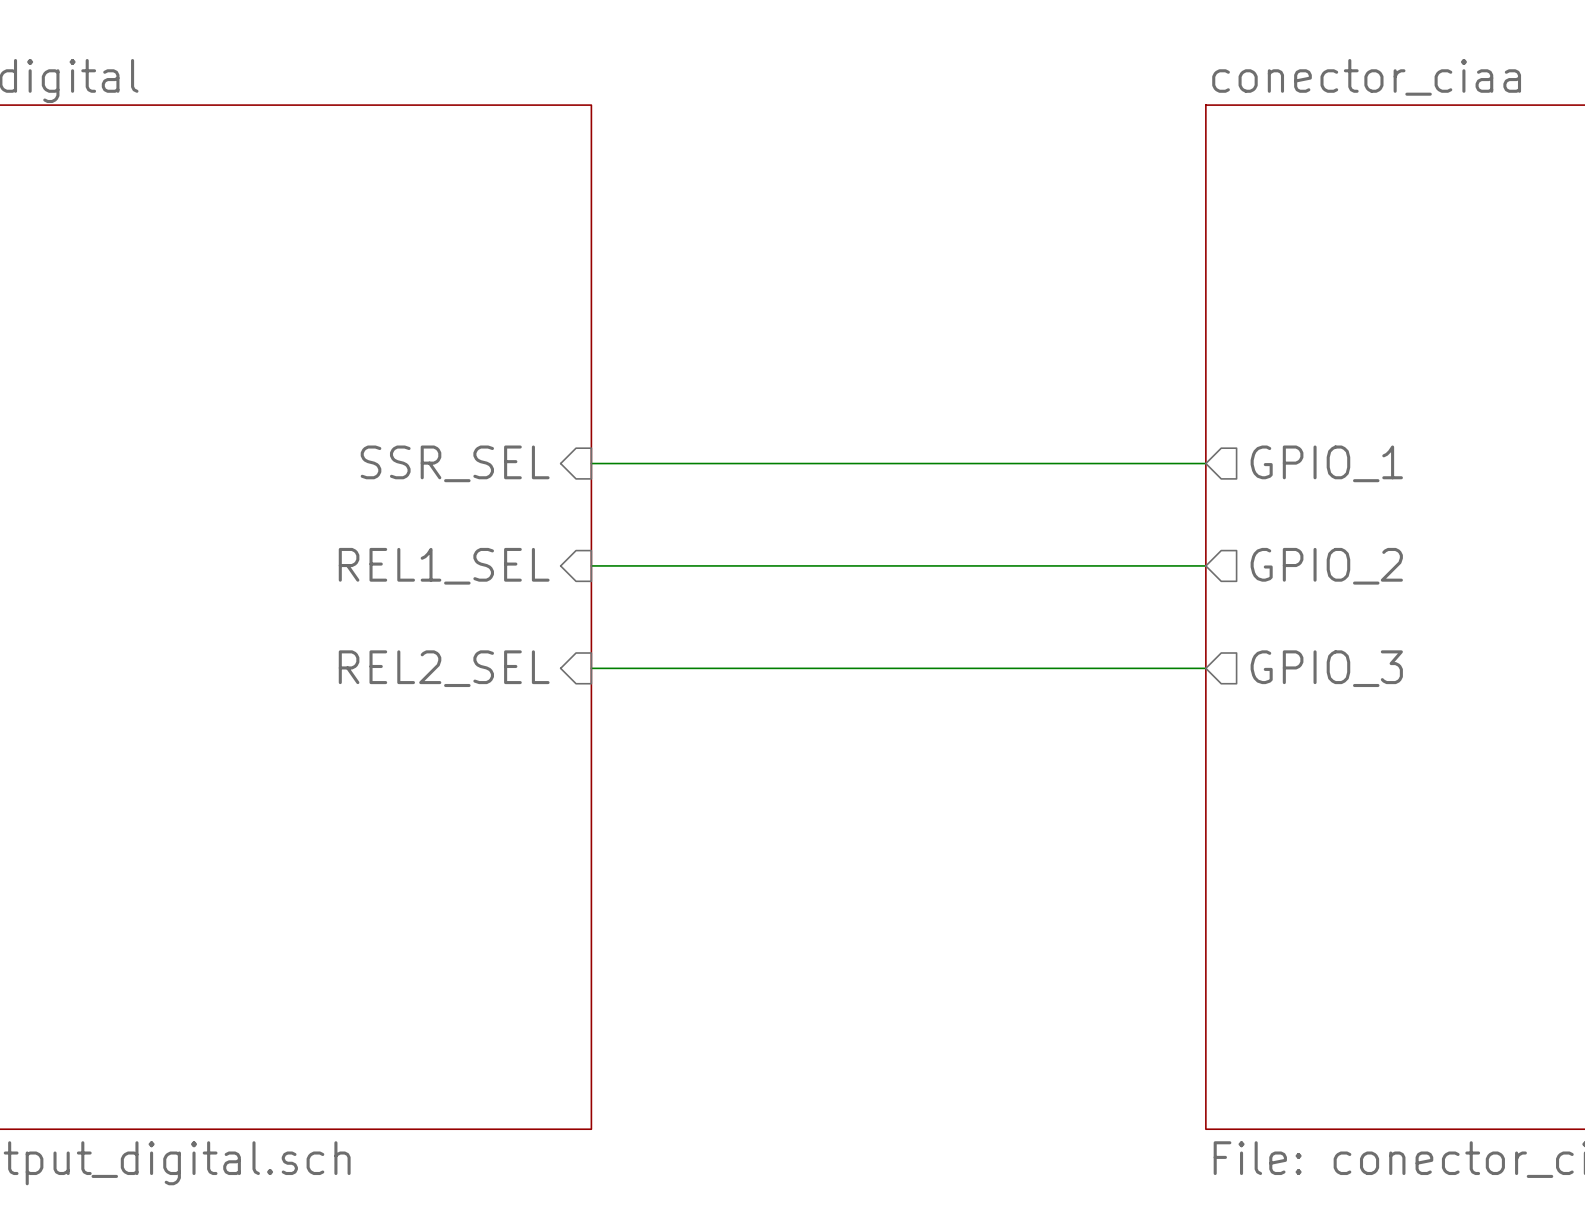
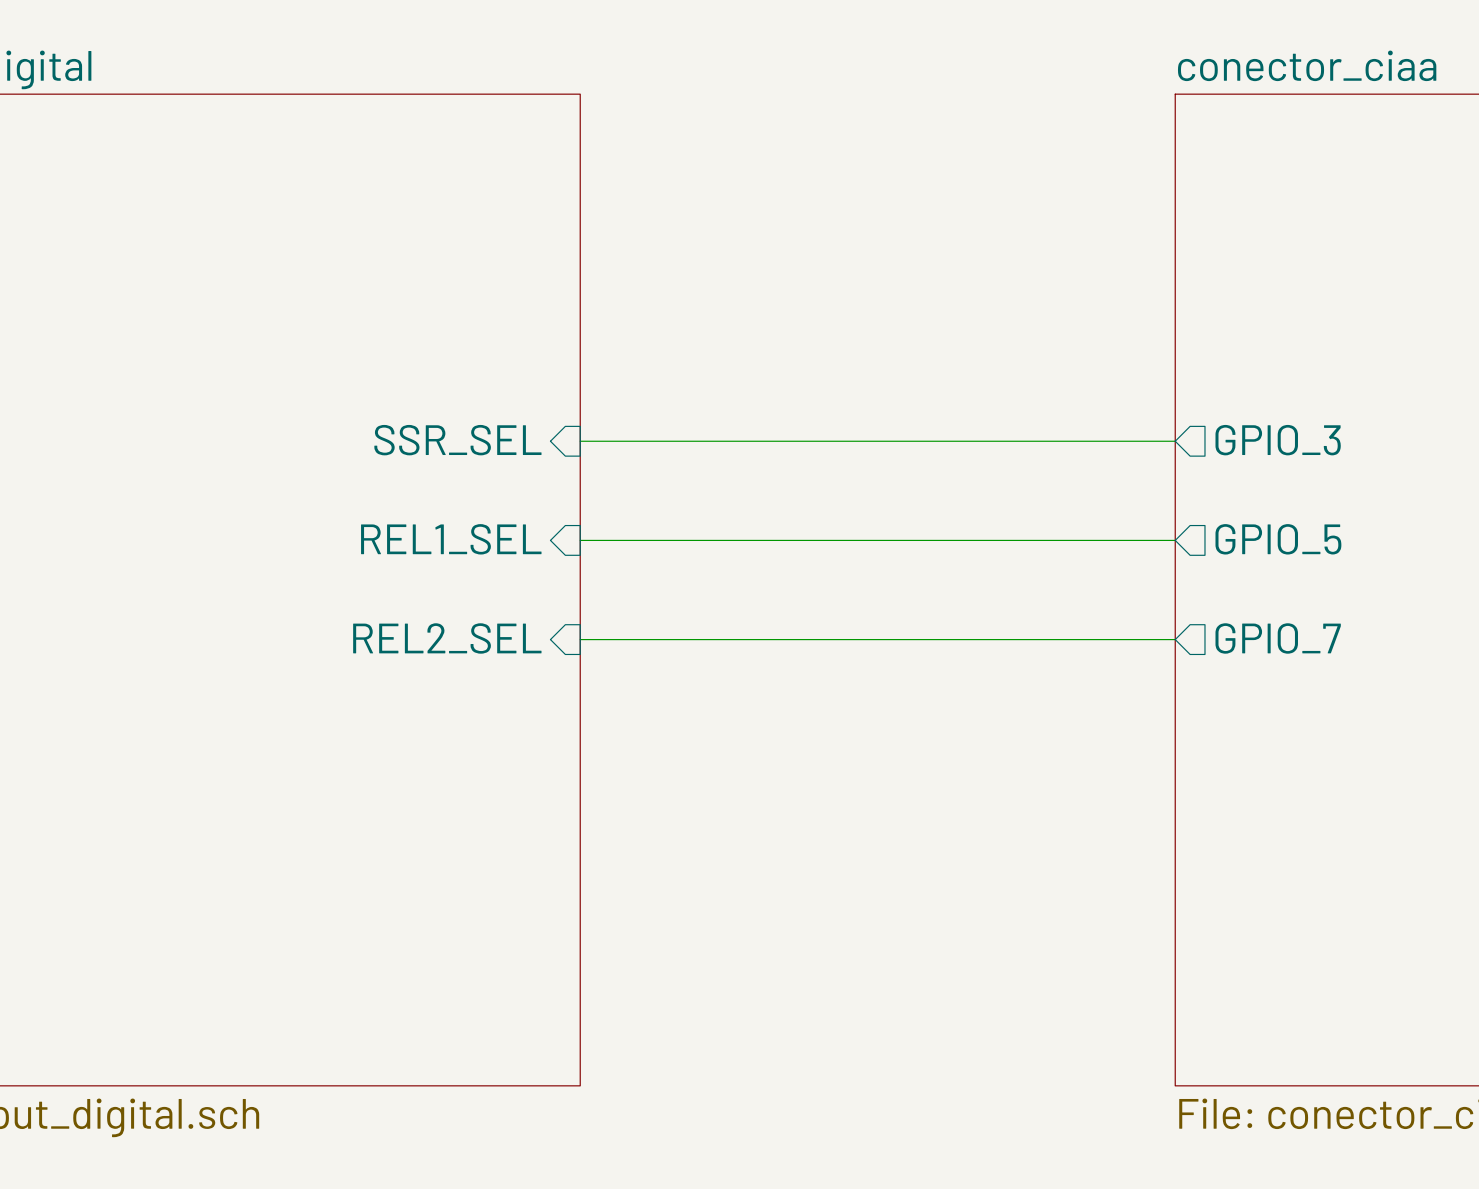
sheet pin: GPIO_1 (1326, 463) -> GPIO_3 (1278, 440)
sheet pin: GPIO_2 (1326, 566) -> GPIO_5 (1278, 539)
sheet pin: GPIO_3 (1326, 668) -> GPIO_7 (1278, 638)

